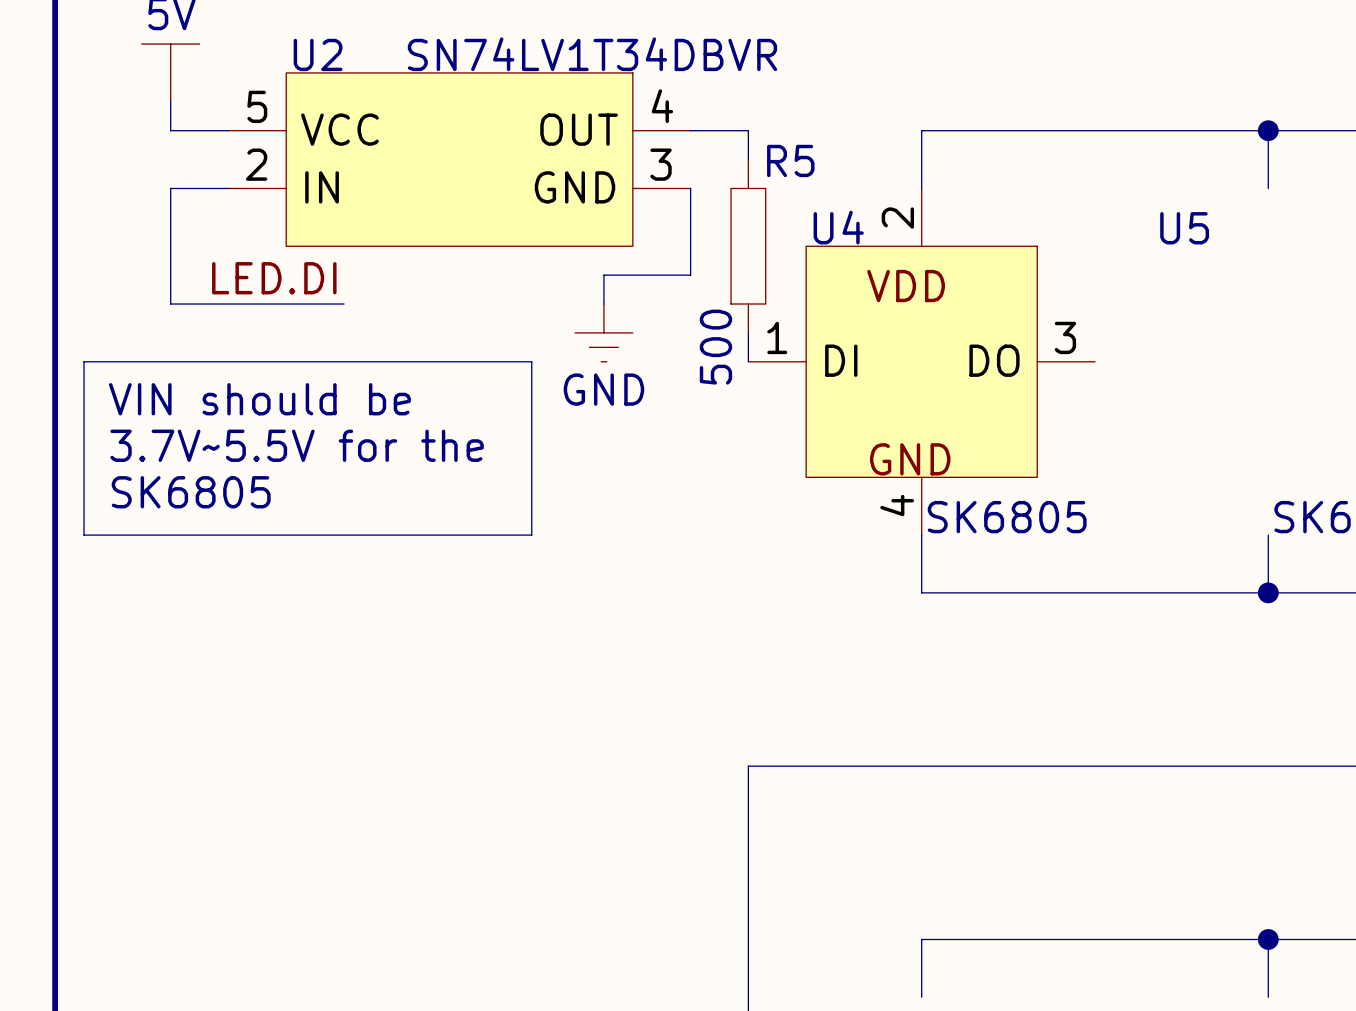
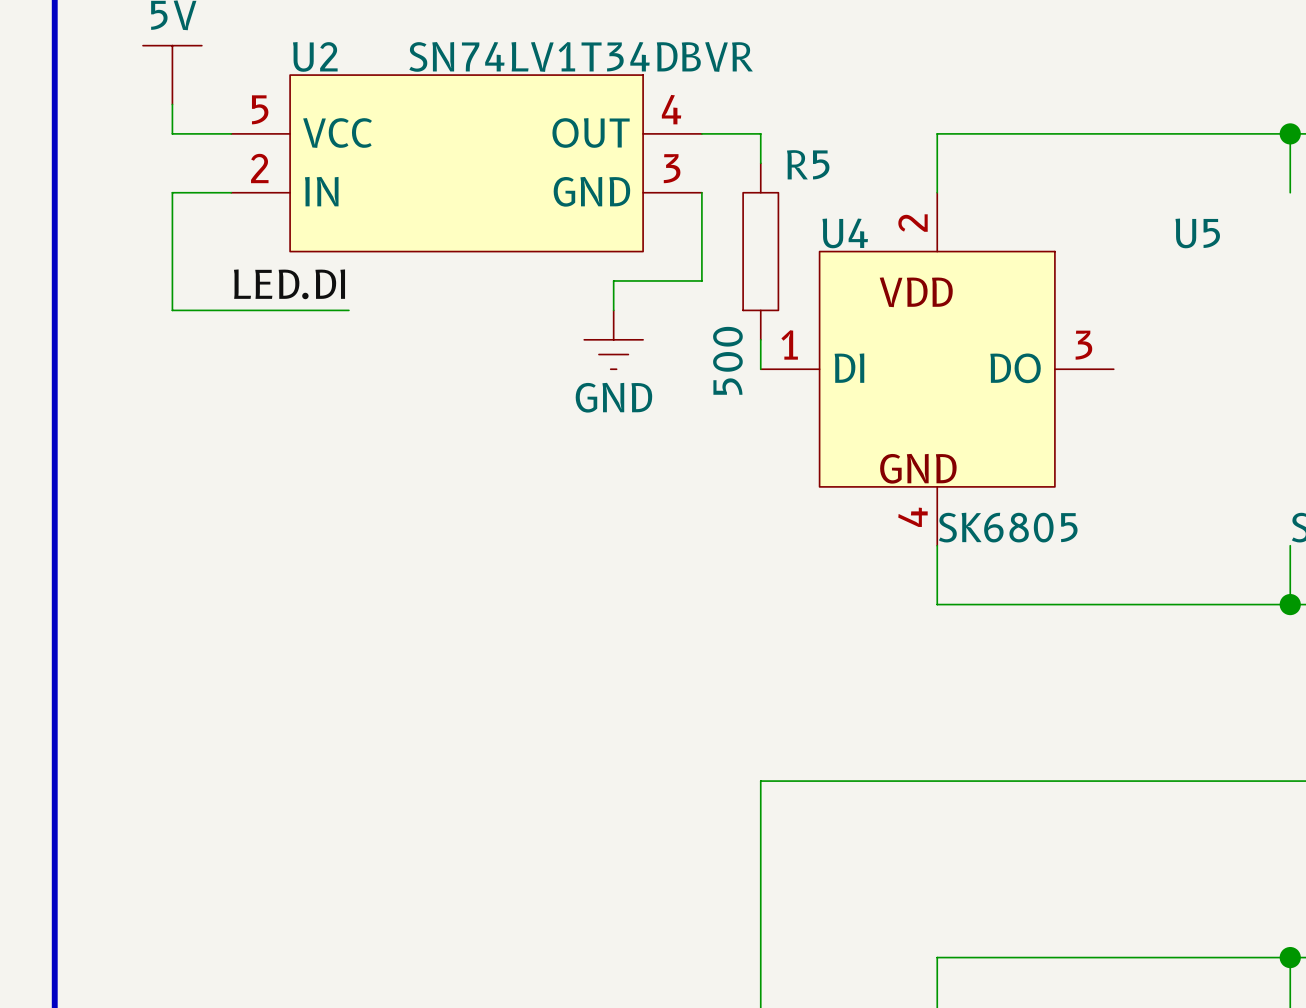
line: (84, 361) (531, 361) (531, 535) (84, 535) (84, 361) -> none
text: VIN should be (259, 399) -> none
text: 3.7V~5.5V for the (297, 445) -> none
text: SK6805 (191, 492) -> none

